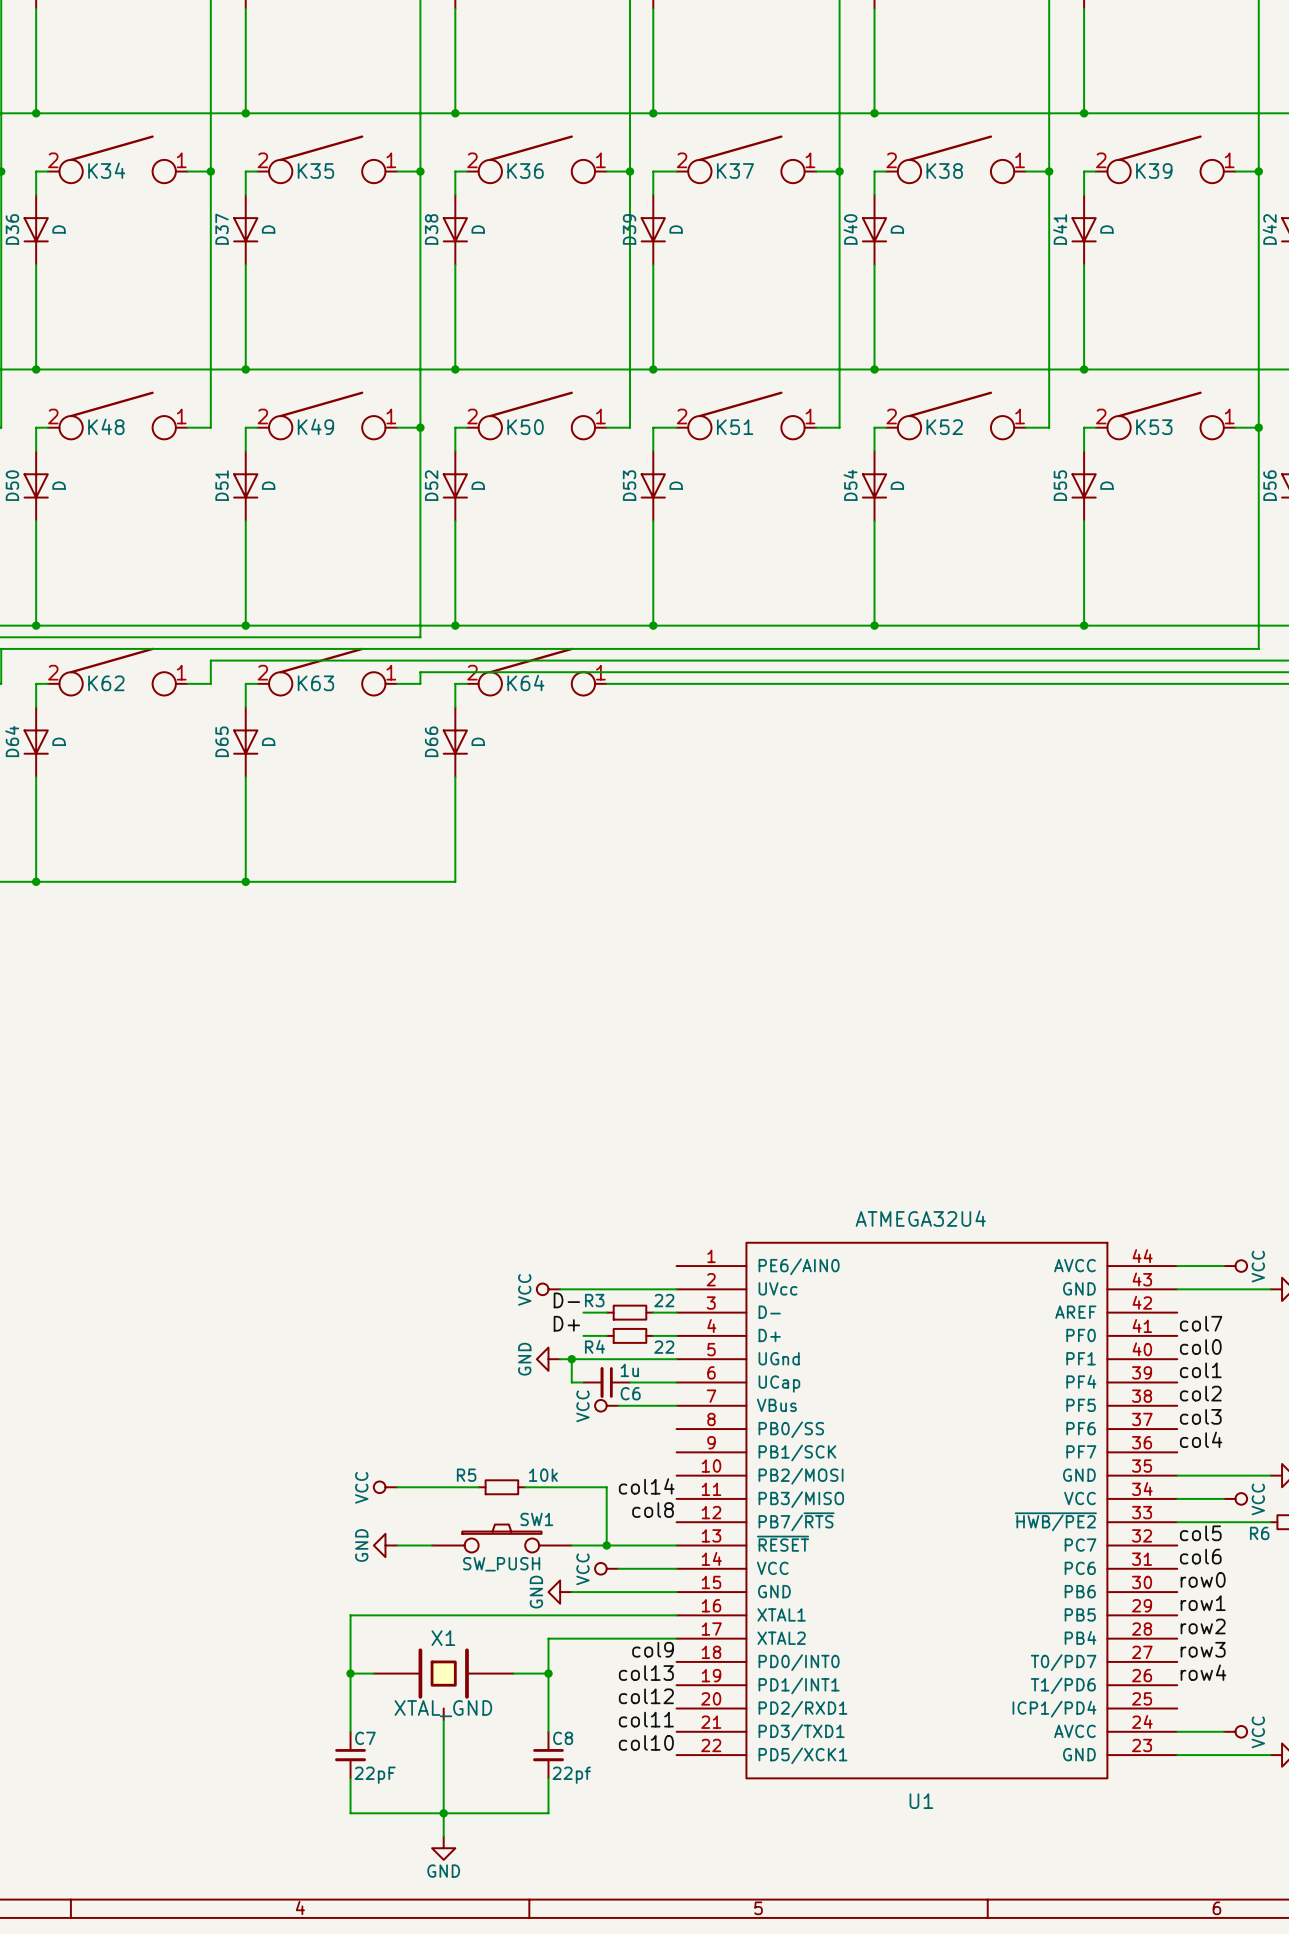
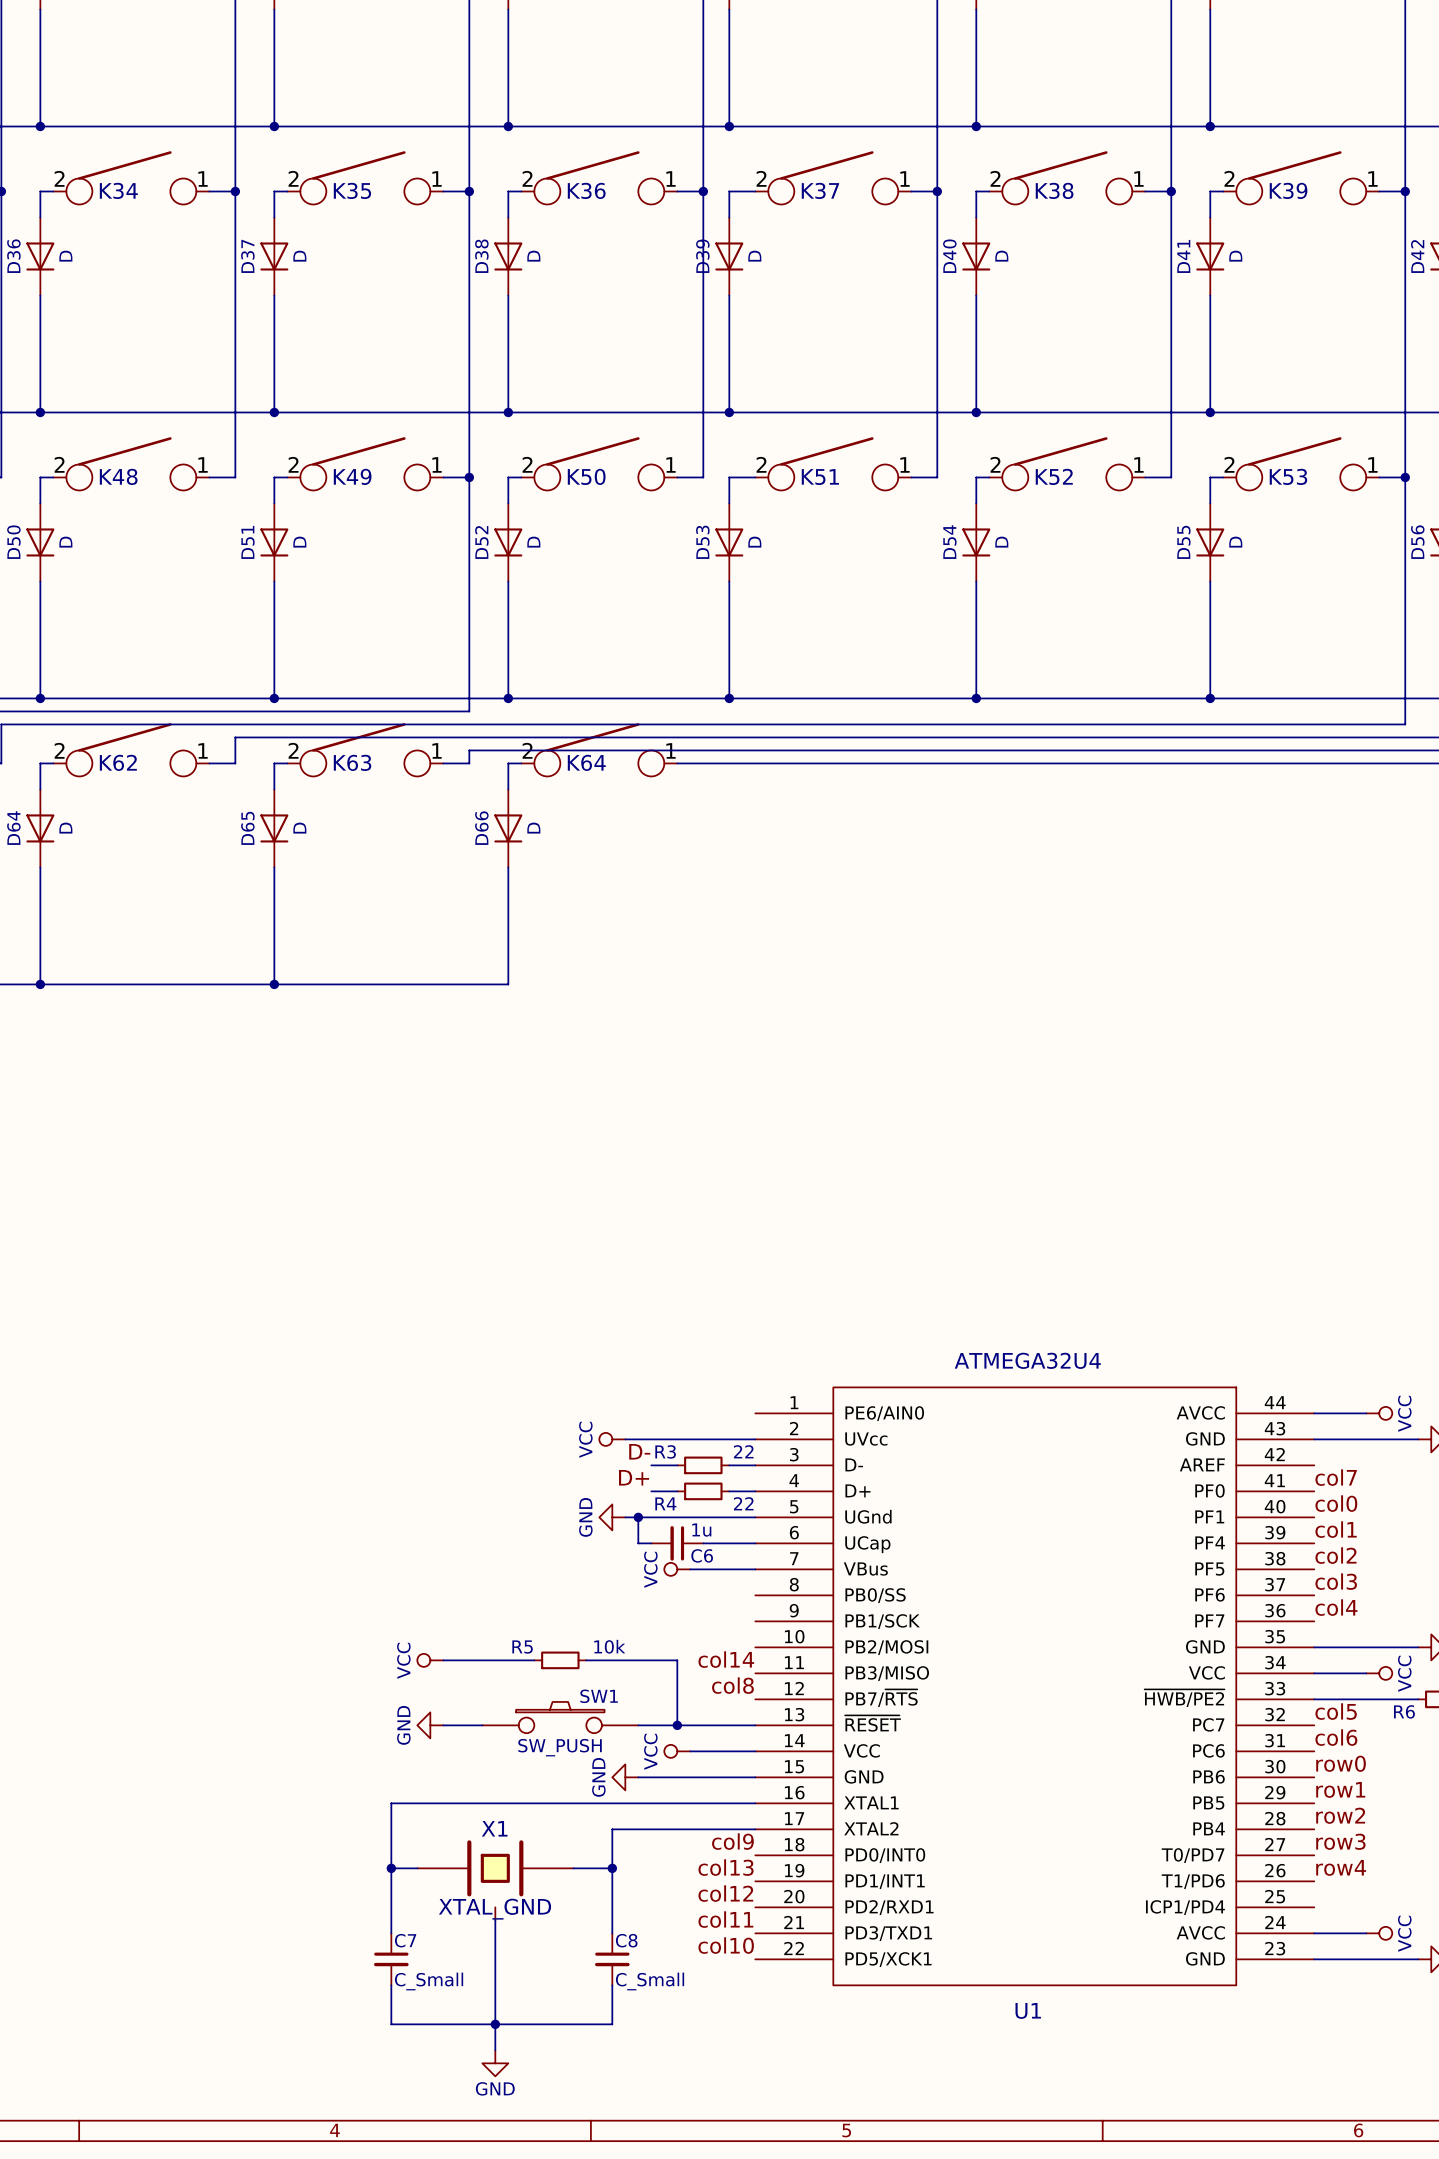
C7 value: 22pF (375, 1775) -> C_Small (429, 1981)
C8 value: 22pf (571, 1775) -> C_Small (650, 1981)

